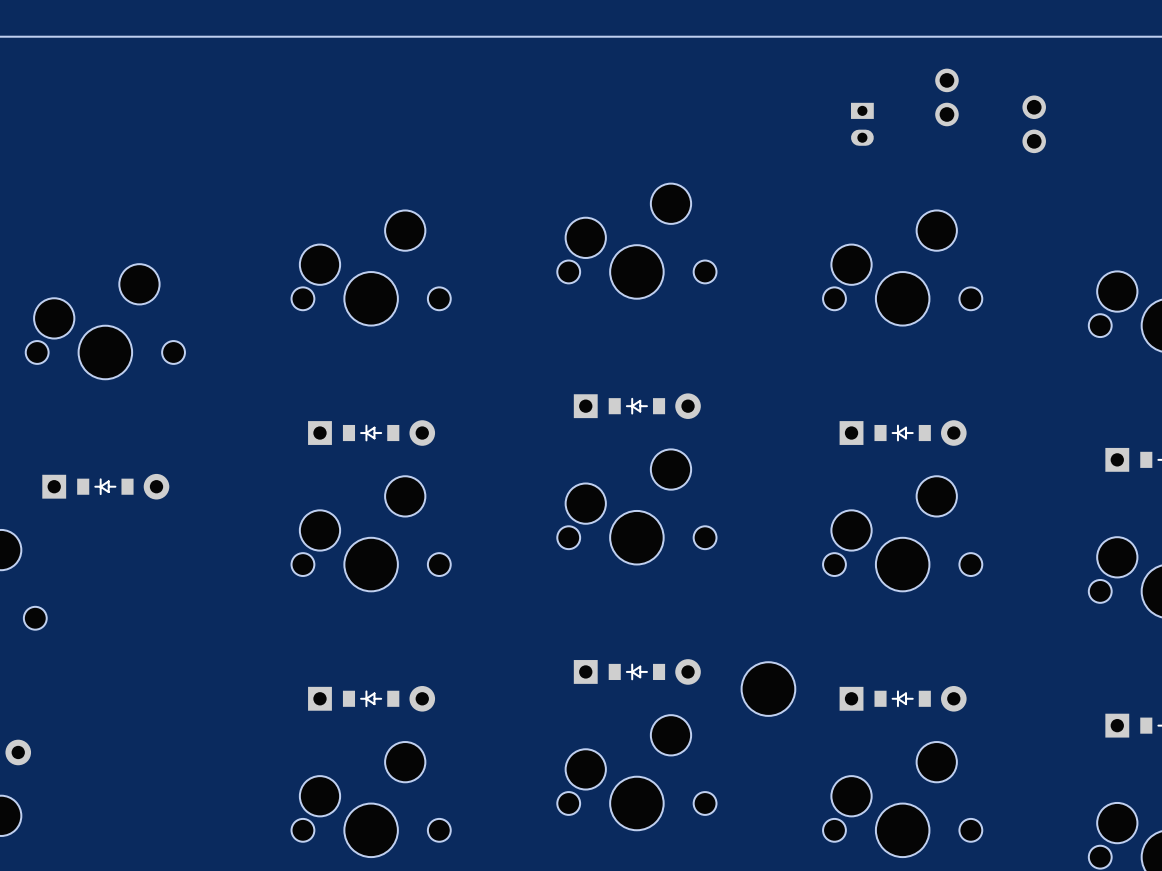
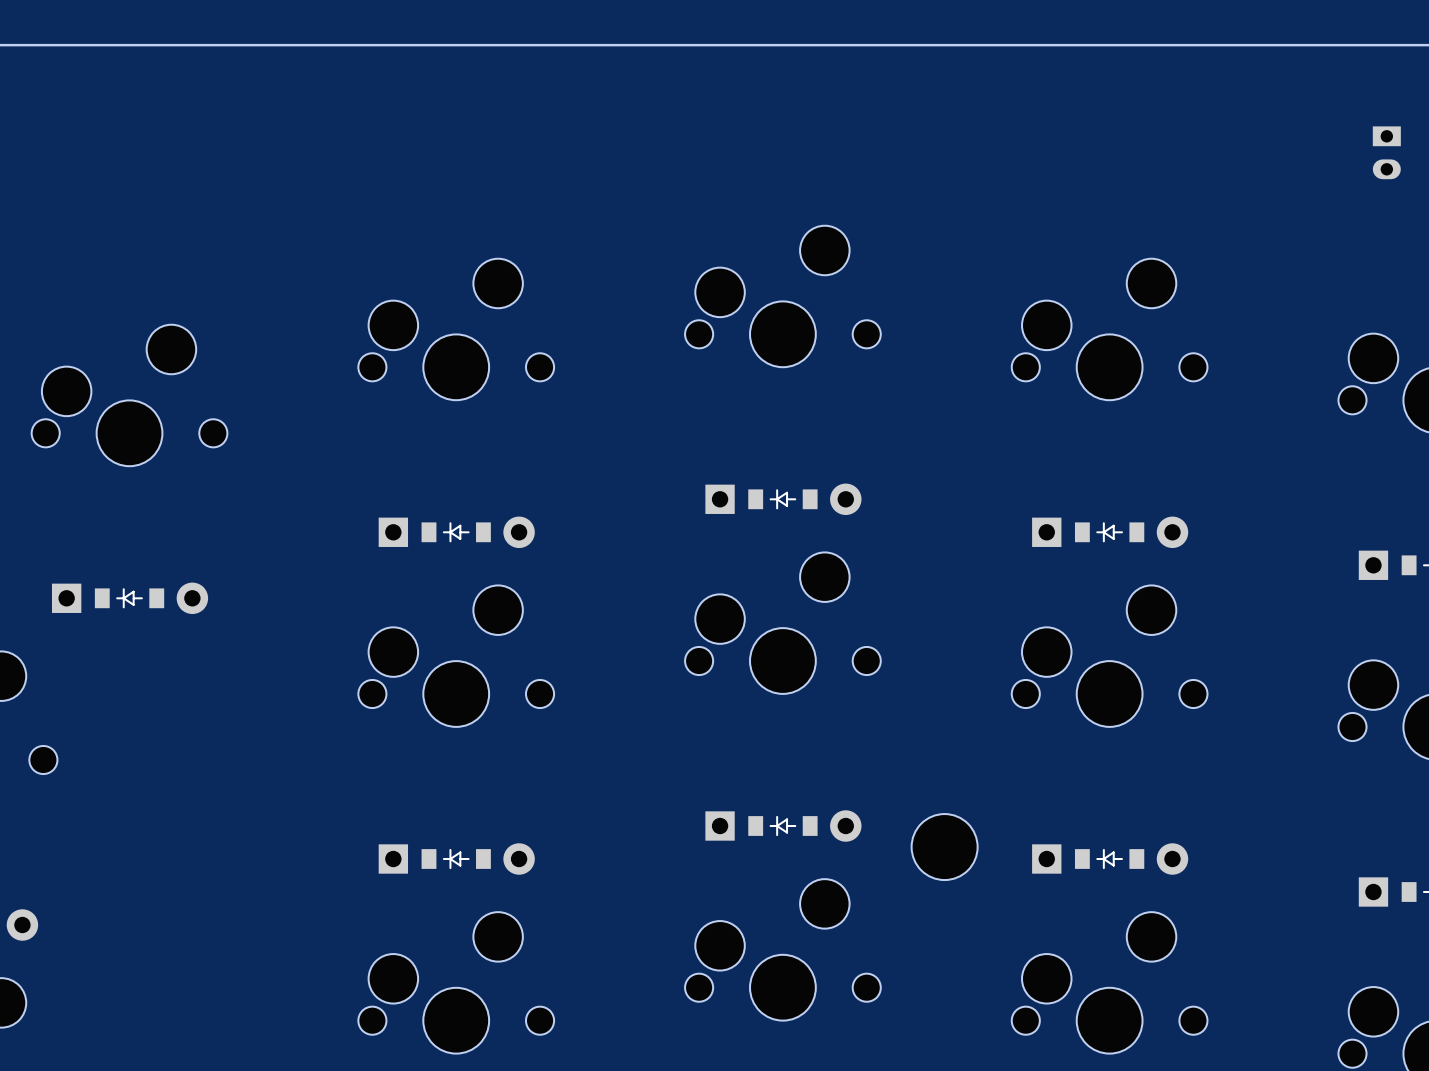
part: (946, 97) -> none
part position: (862, 124) -> (1386, 152)
part: (1034, 124) -> none

